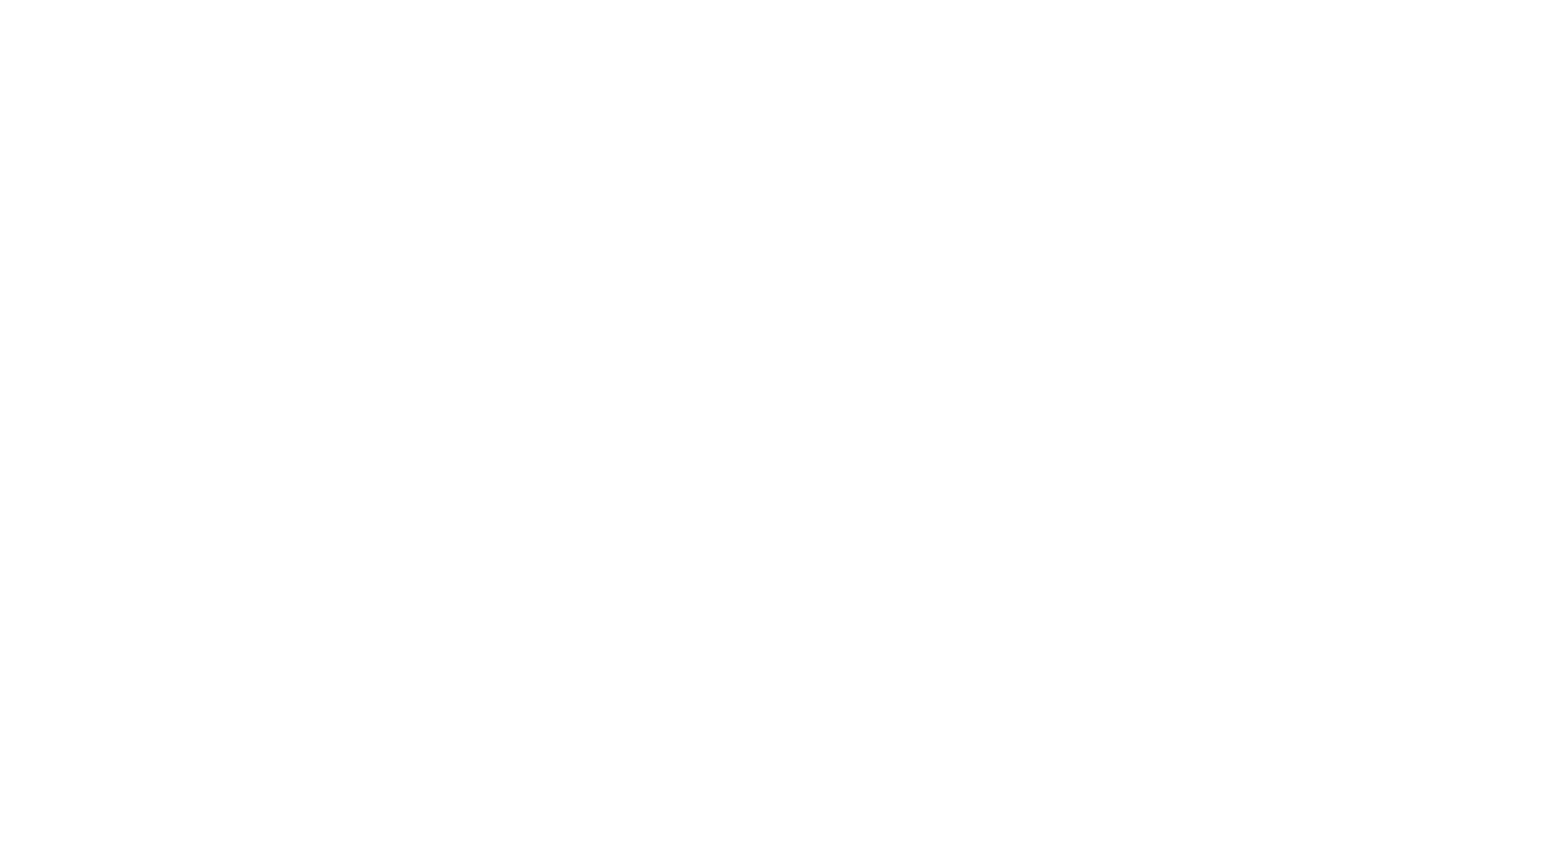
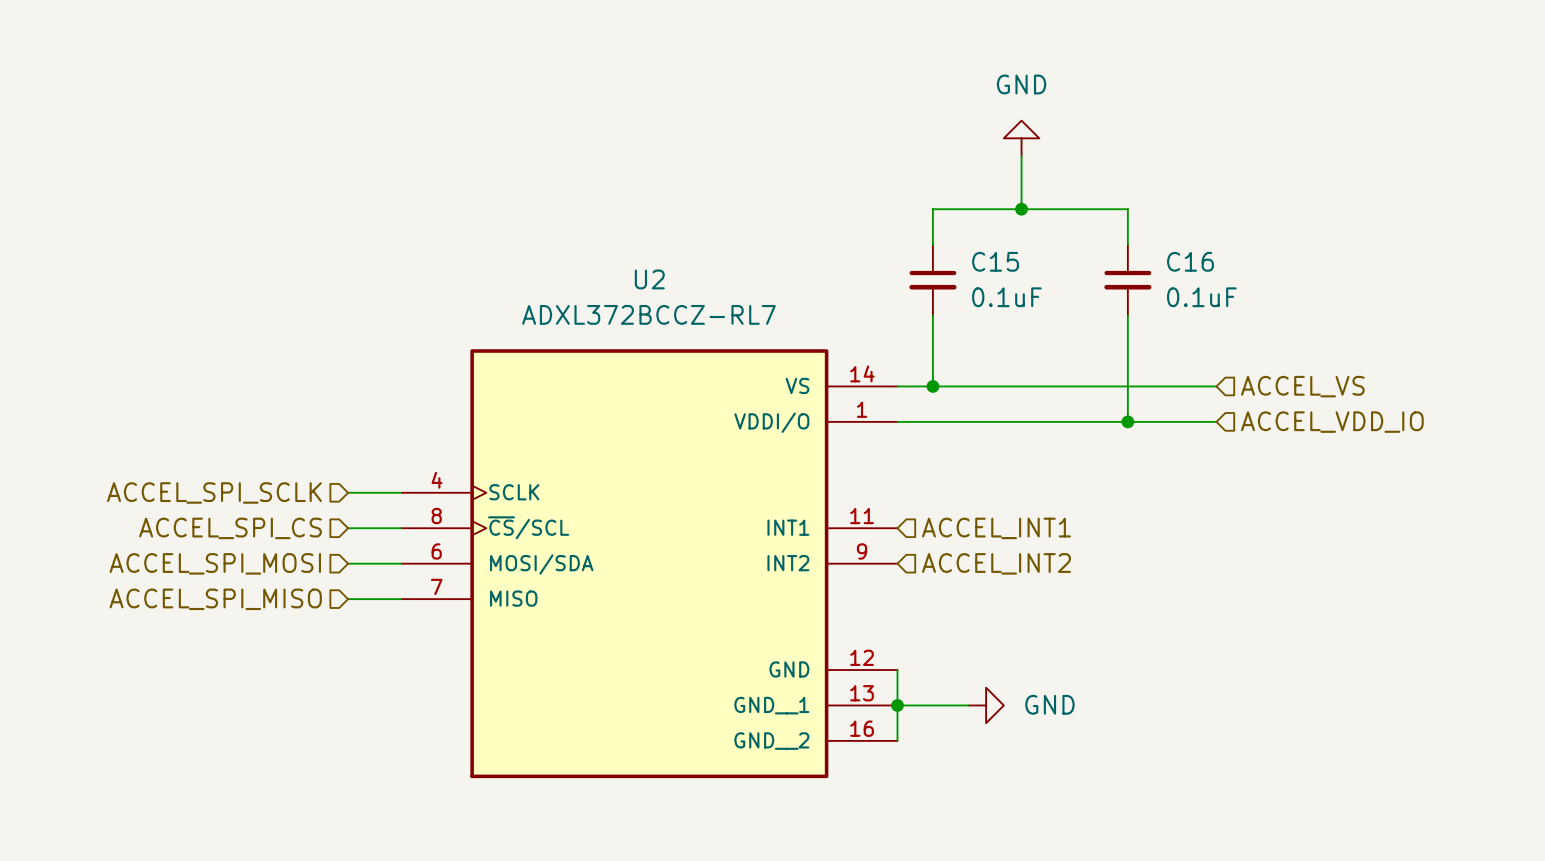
power symbol: none -> GND (1021, 138)
wire: none -> (1021, 156) (1021, 209)
junction: none -> (1021, 209)
wire: none -> (932, 244) (932, 209) (1127, 209) (1127, 244)
C15: none -> 0.1uF (932, 280)
C16: none -> 0.1uF (1127, 280)
wire: none -> (932, 315) (932, 386)
wire: none -> (1127, 315) (1127, 421)
wire: none -> (897, 386) (1216, 386)
junction: none -> (932, 386)
hierarchical label: none -> ACCEL_VS (1302, 386)
wire: none -> (897, 421) (1216, 421)
junction: none -> (1127, 421)
hierarchical label: none -> ACCEL_VDD_IO (1332, 422)
hierarchical label: none -> ACCEL_SPI_SCLK (214, 492)
wire: none -> (348, 492) (401, 492)
hierarchical label: none -> ACCEL_SPI_CS (230, 528)
wire: none -> (348, 528) (401, 528)
hierarchical label: none -> ACCEL_INT1 (996, 528)
hierarchical label: none -> ACCEL_SPI_MOSI (215, 563)
wire: none -> (348, 563) (401, 563)
U2: none -> ADXL372BCCZ-RL7 (649, 563)
hierarchical label: none -> ACCEL_INT2 (996, 563)
hierarchical label: none -> ACCEL_SPI_MISO (215, 599)
wire: none -> (348, 599) (401, 599)
wire: none -> (897, 670) (897, 740)
wire: none -> (897, 705) (968, 705)
junction: none -> (897, 705)
power symbol: none -> GND (986, 705)

